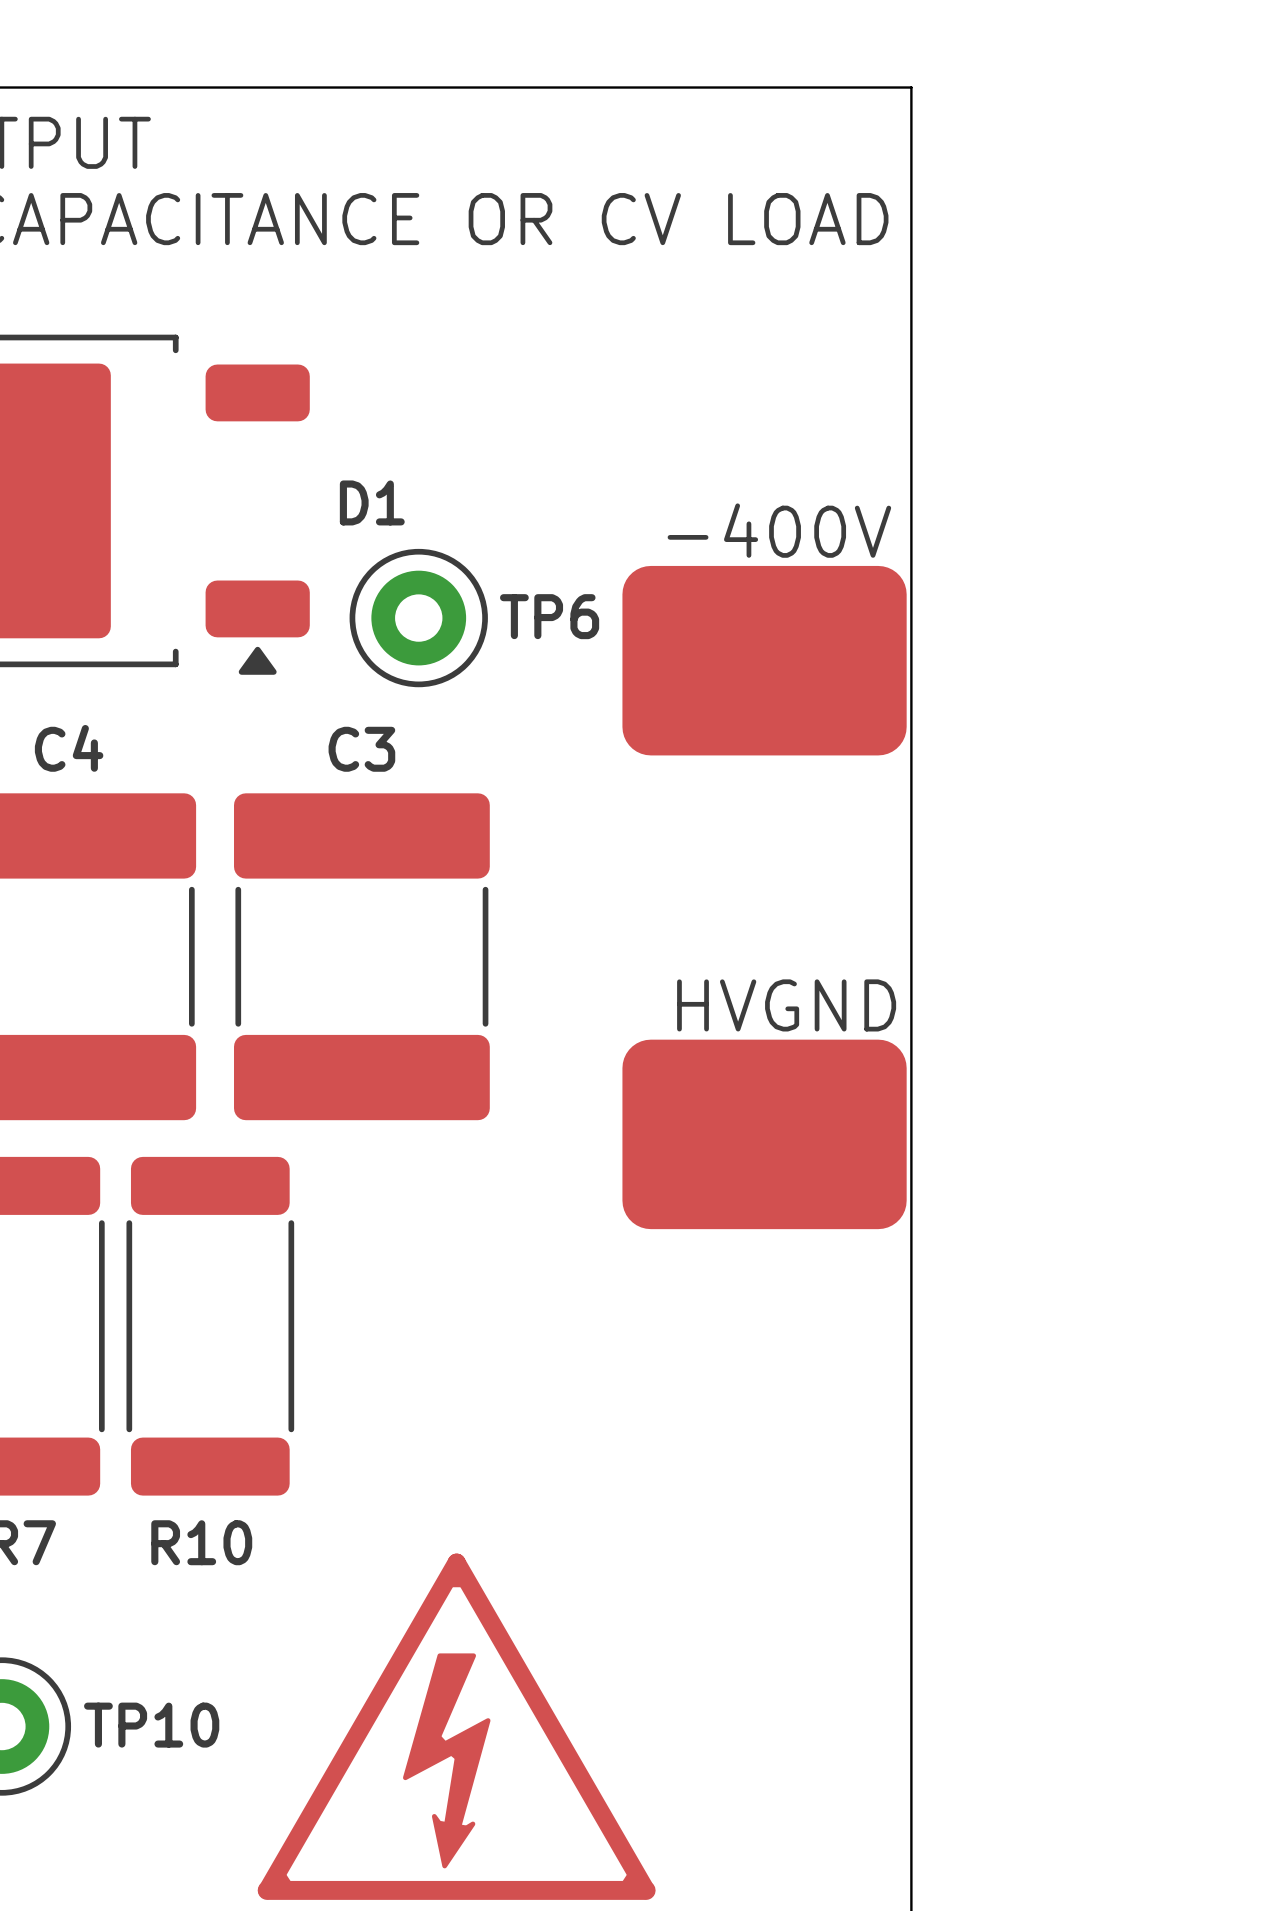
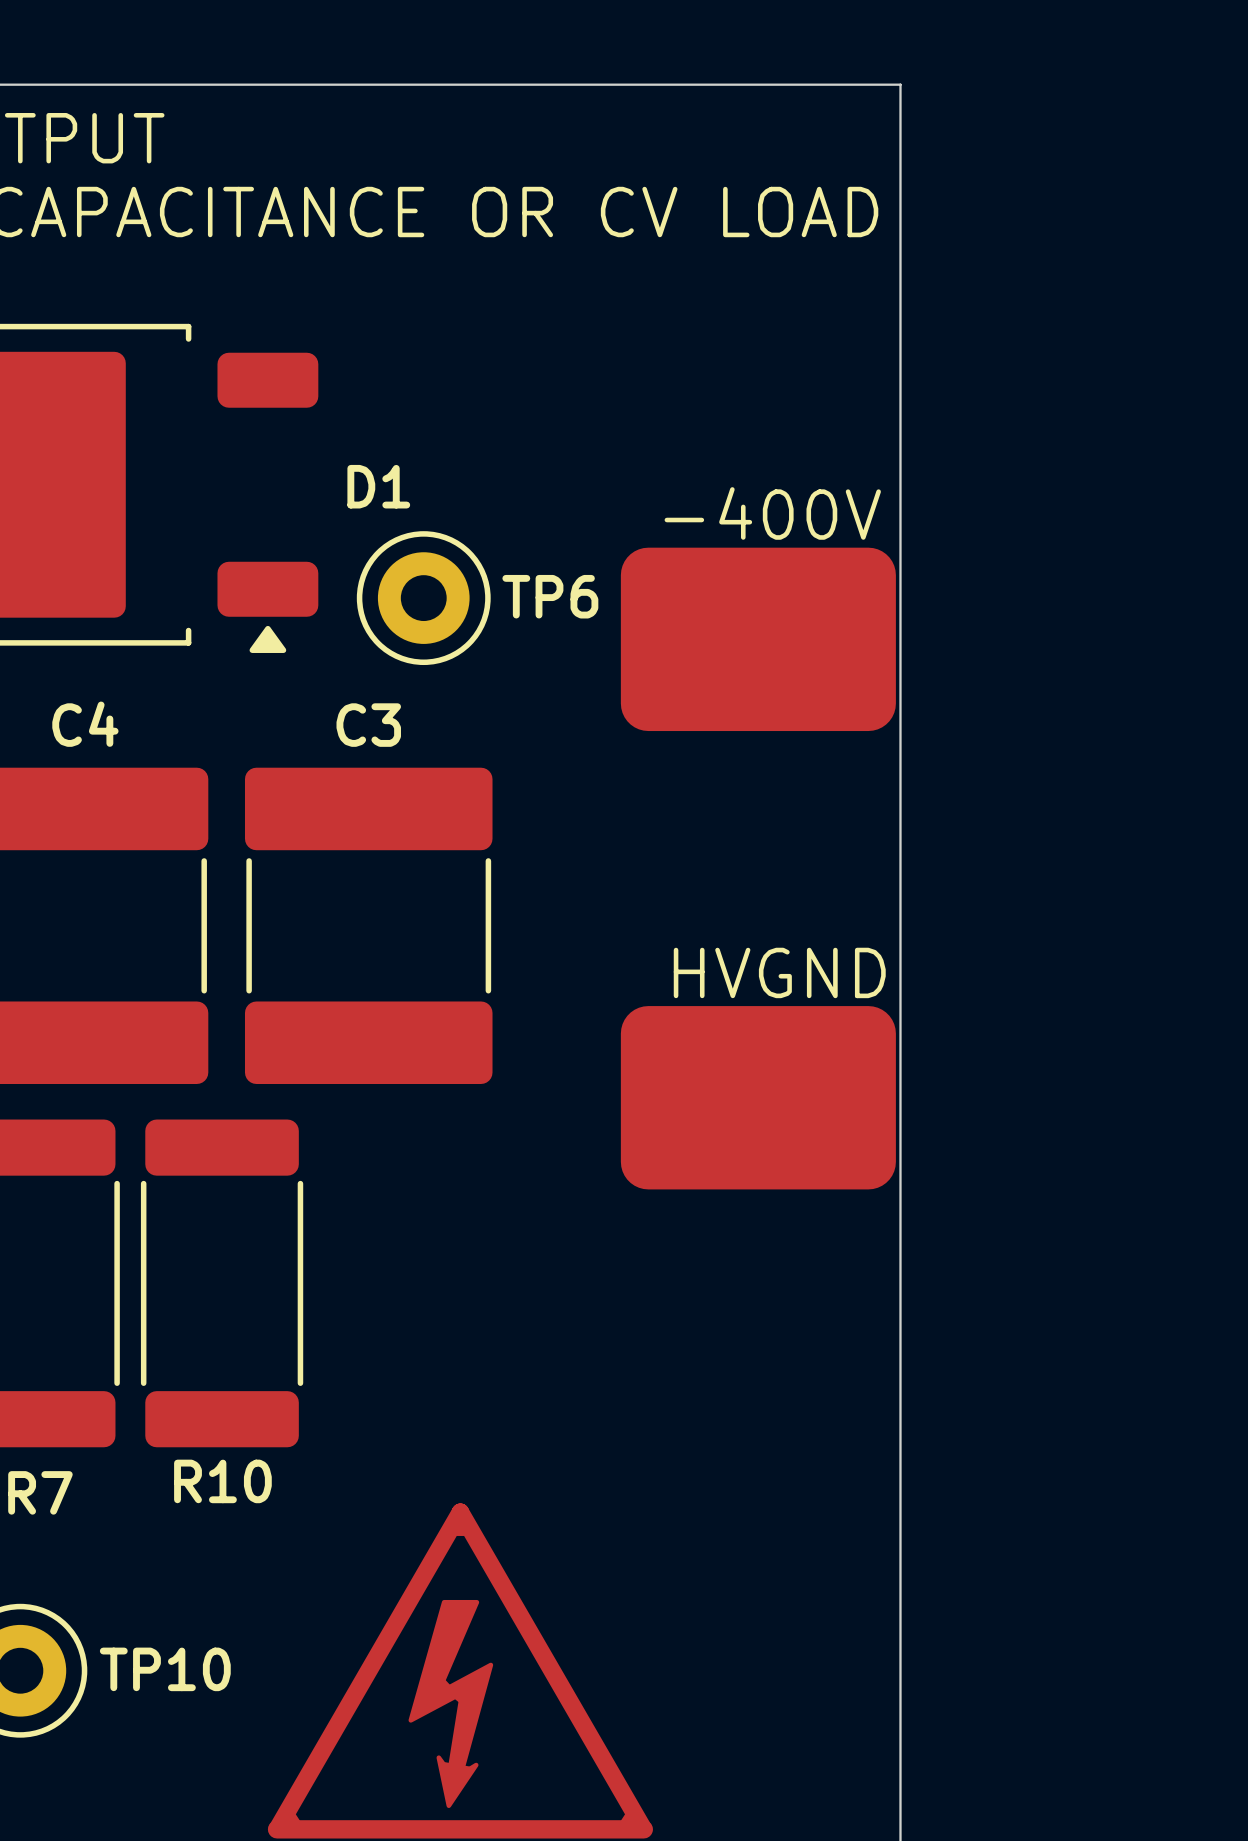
R10 name position: R10 (201, 1542) -> R10 (222, 1481)

